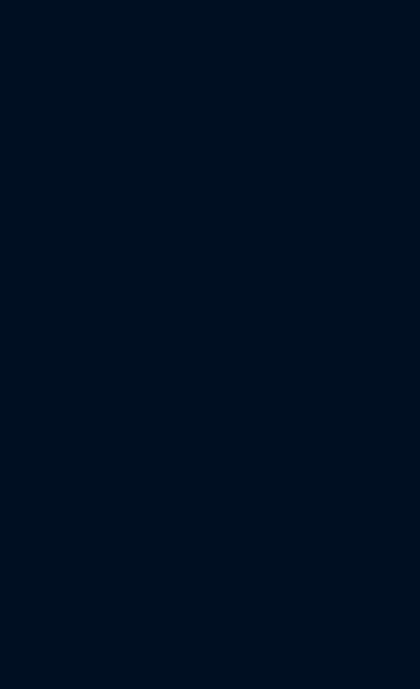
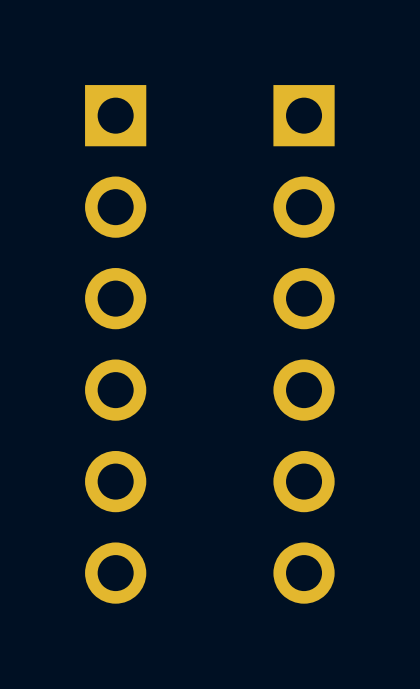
part: none -> (115, 344)
part: none -> (304, 344)

